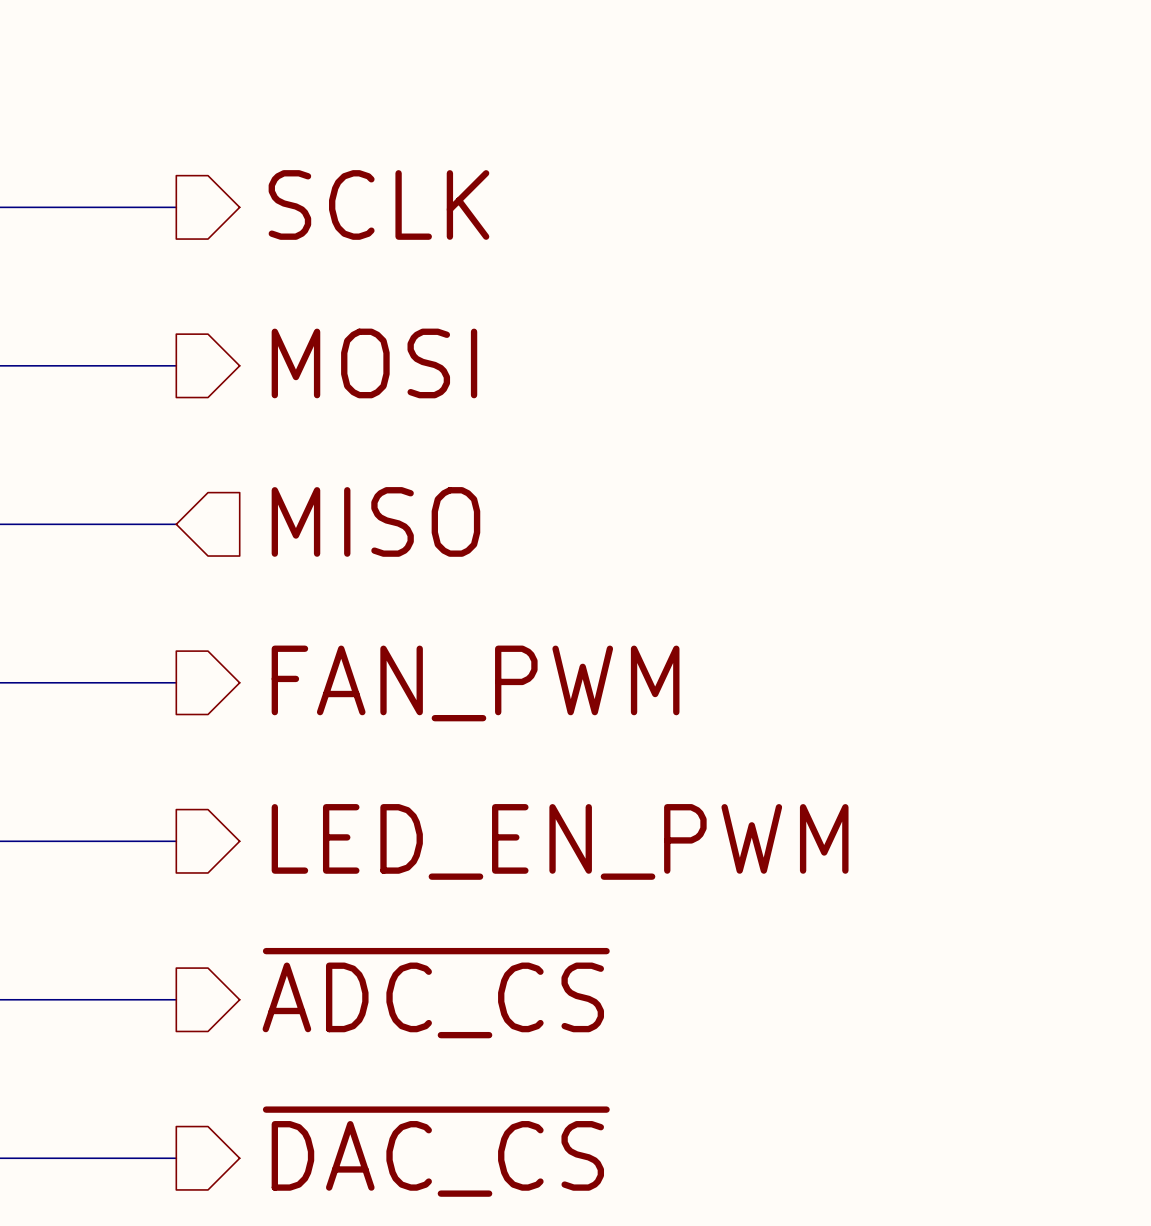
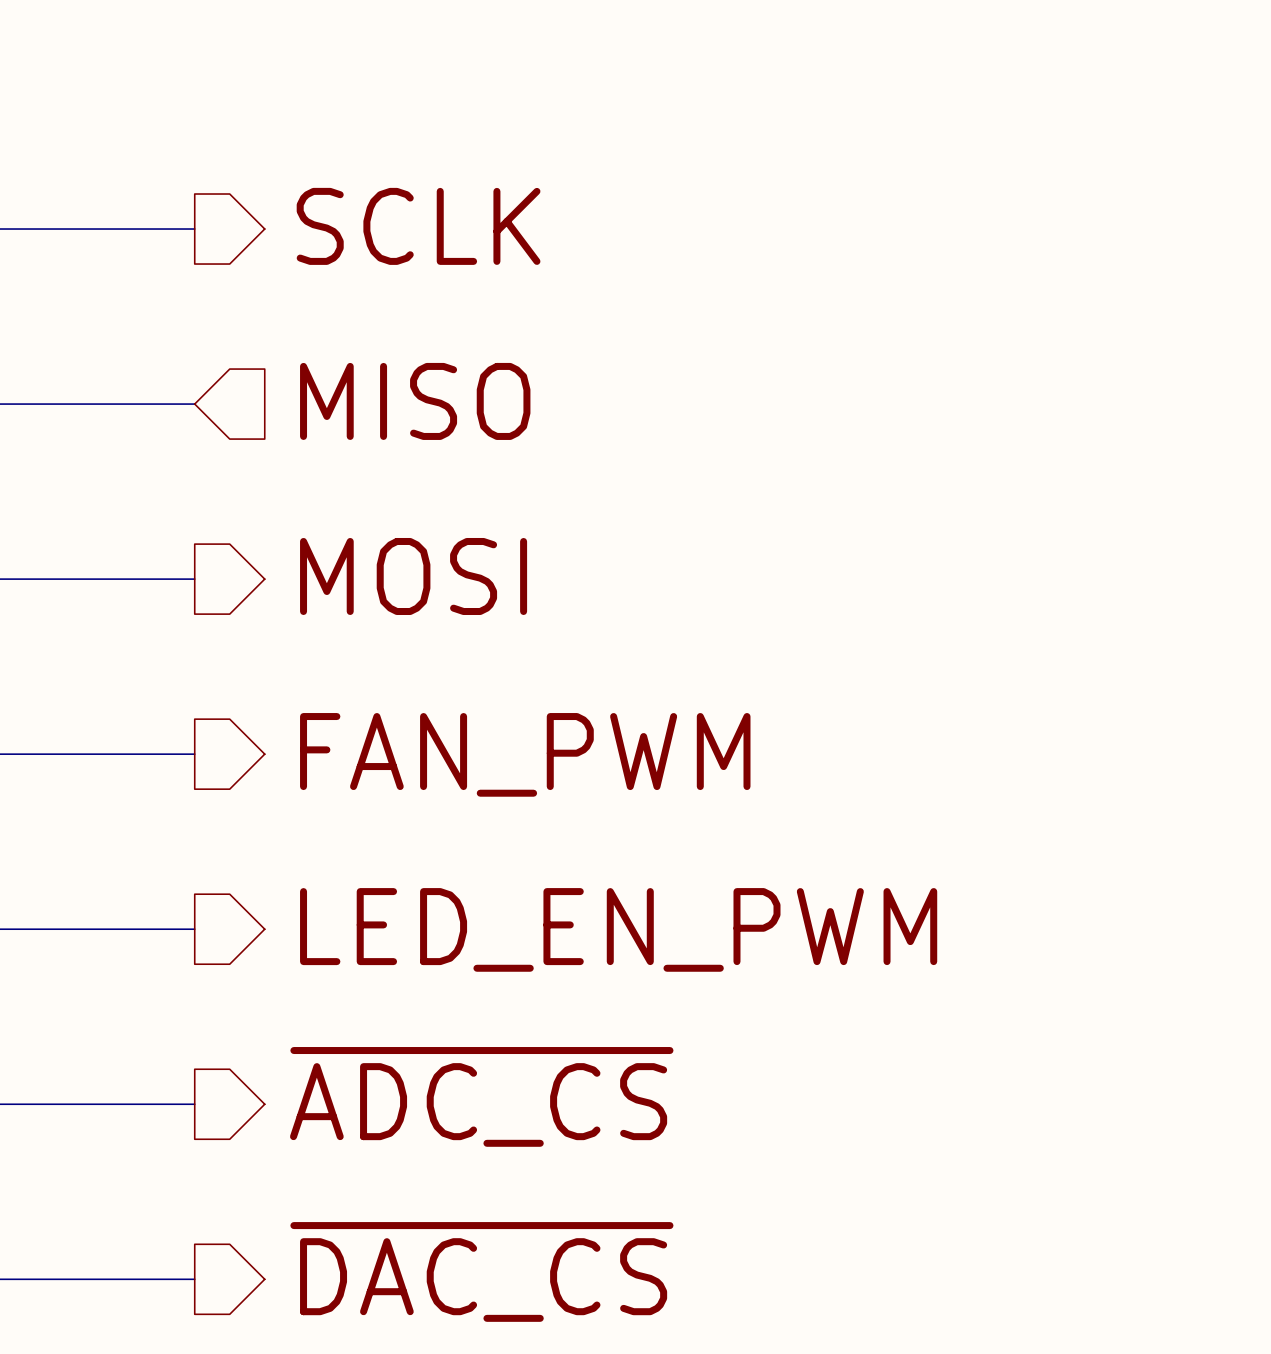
hierarchical label shape: output (374, 363) -> input (415, 401)
hierarchical label: MOSI (374, 363) -> MISO (415, 401)
hierarchical label shape: input (375, 521) -> output (413, 576)
hierarchical label: MISO (375, 521) -> MOSI (413, 576)

